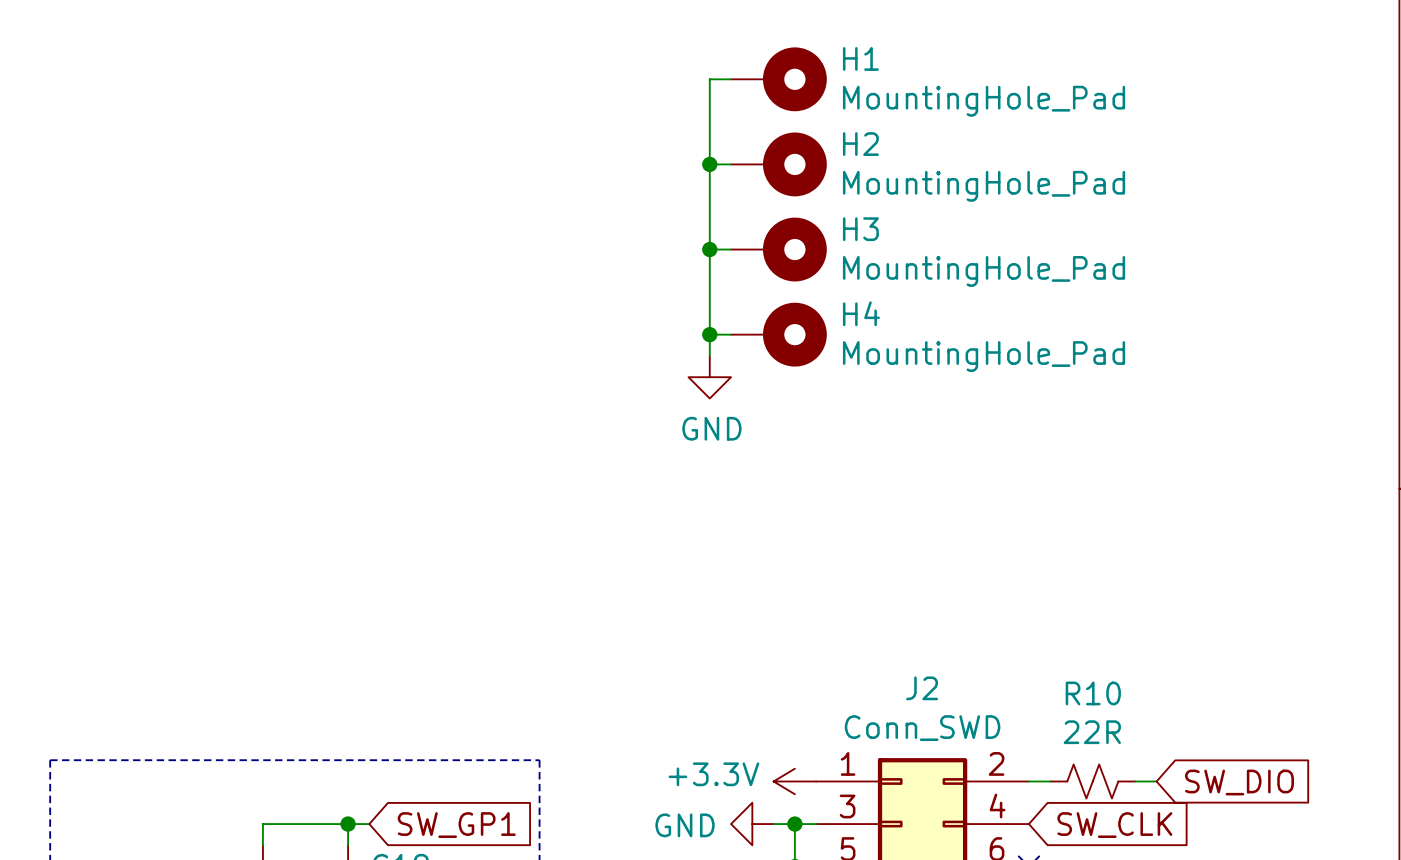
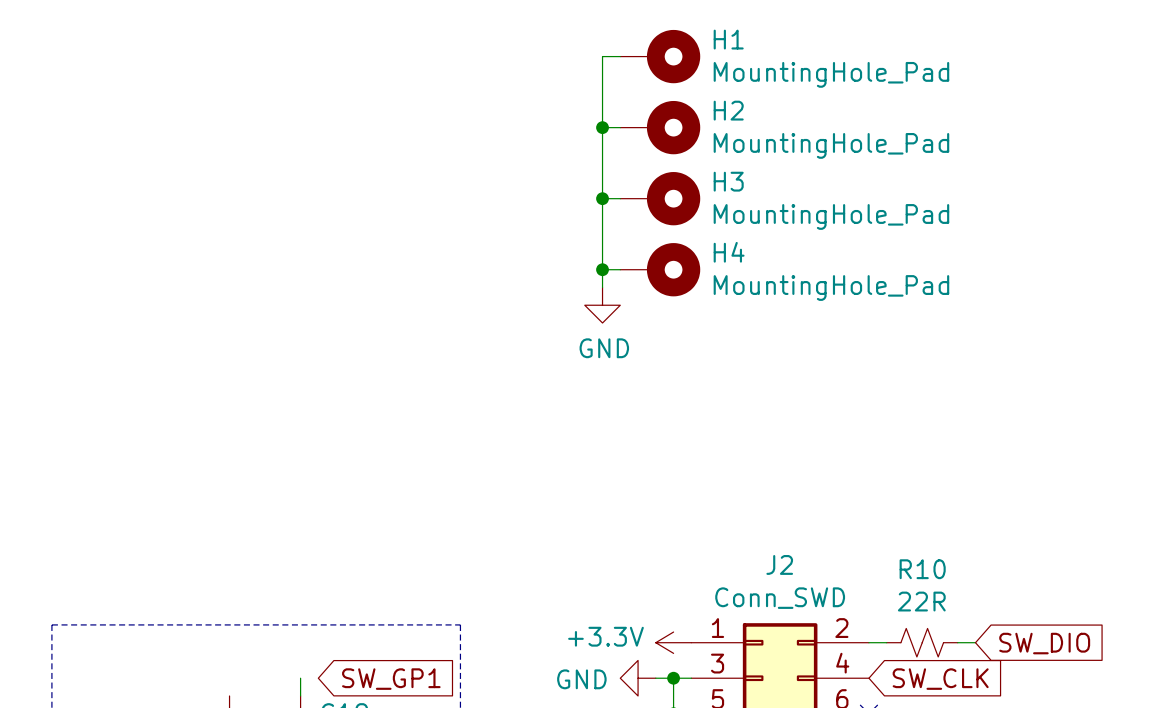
junction: (348, 824) -> none
wire: (369, 824) (262, 824) (262, 845) -> none

